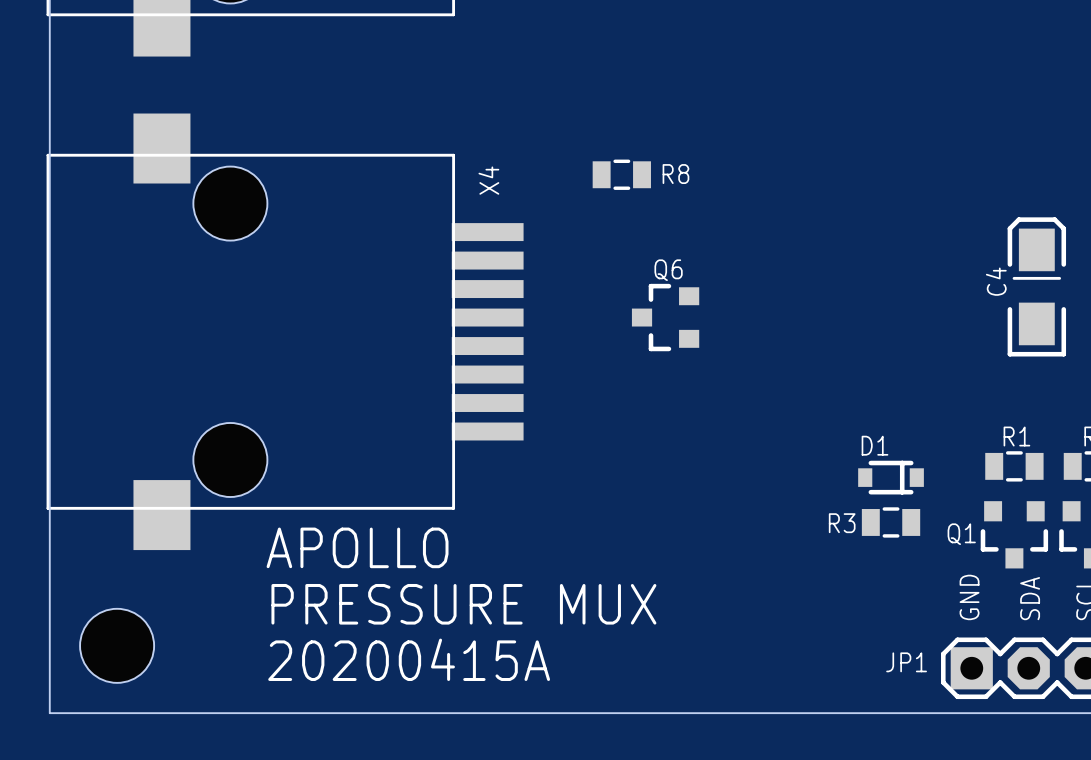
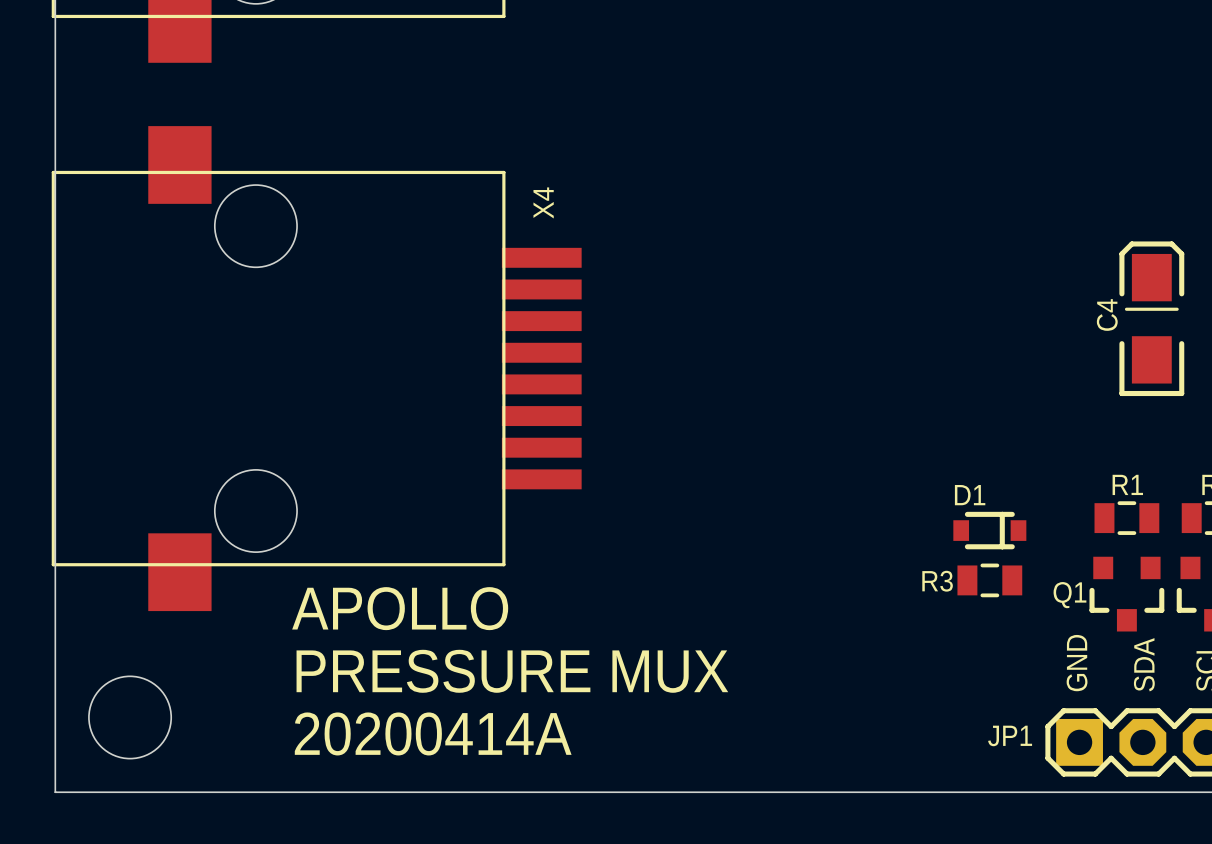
R8: (621, 174) -> none
Q6: (665, 317) -> none
text: 20200415A (409, 659) -> 20200414A (433, 733)

